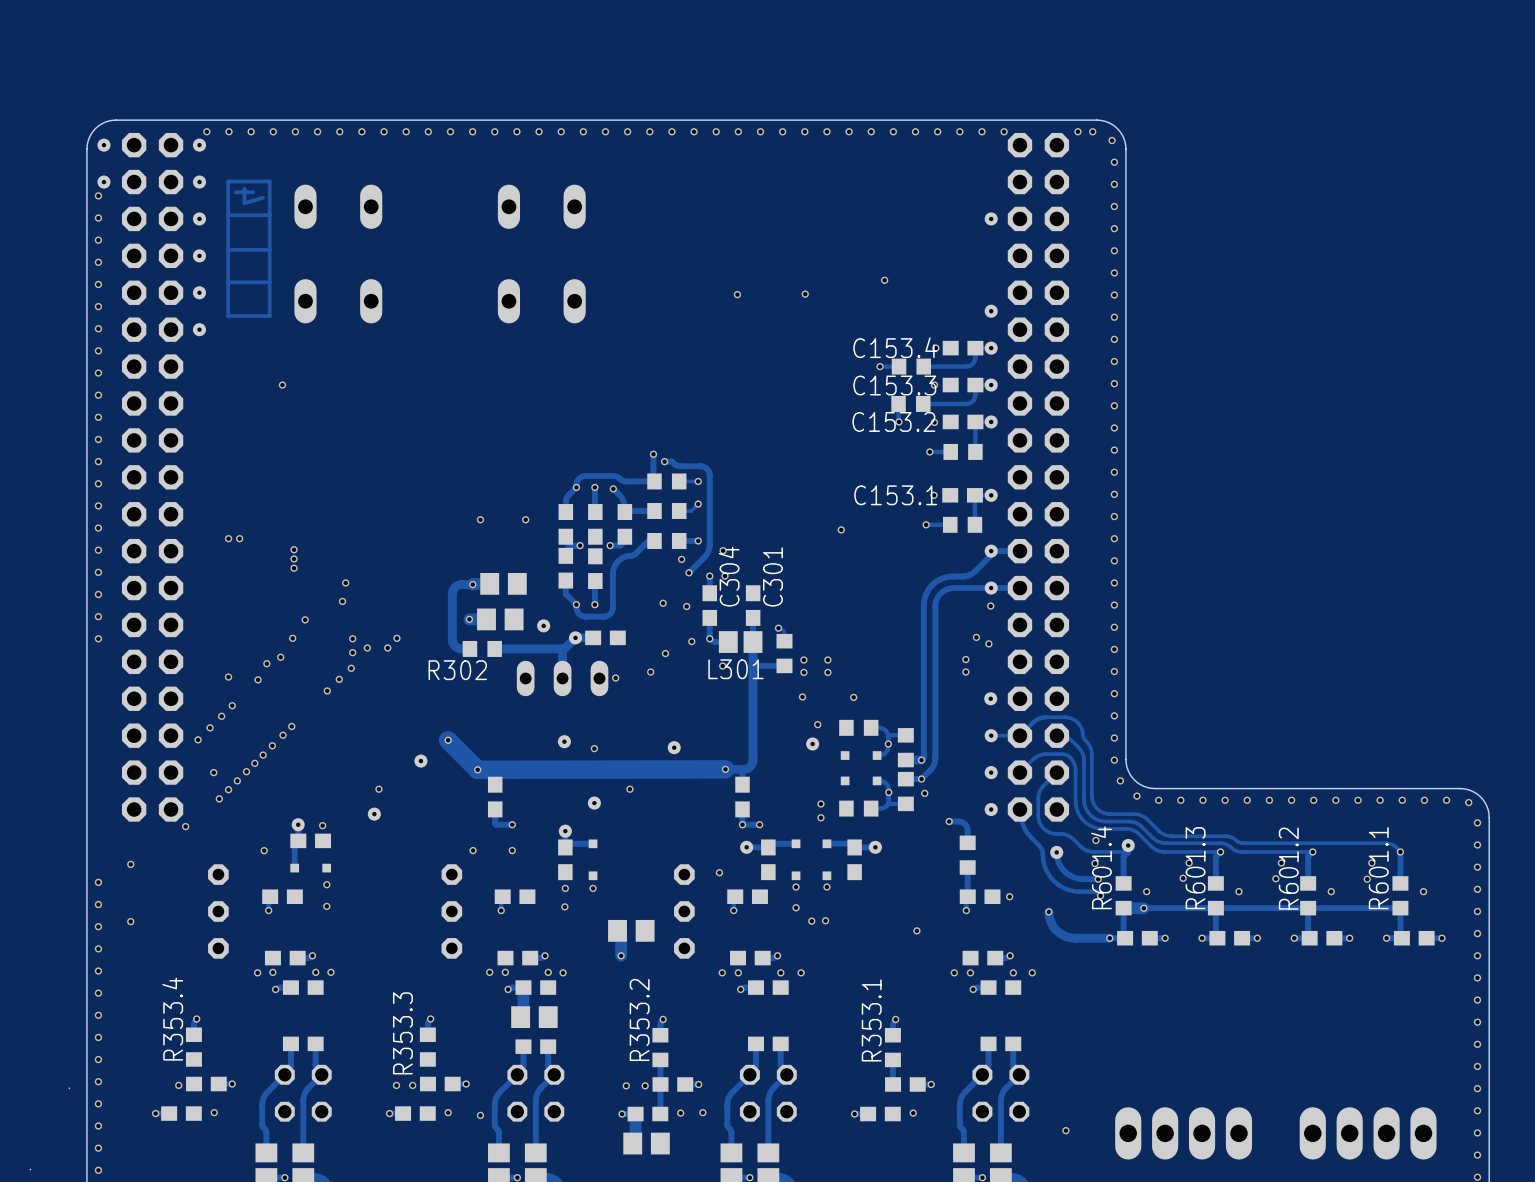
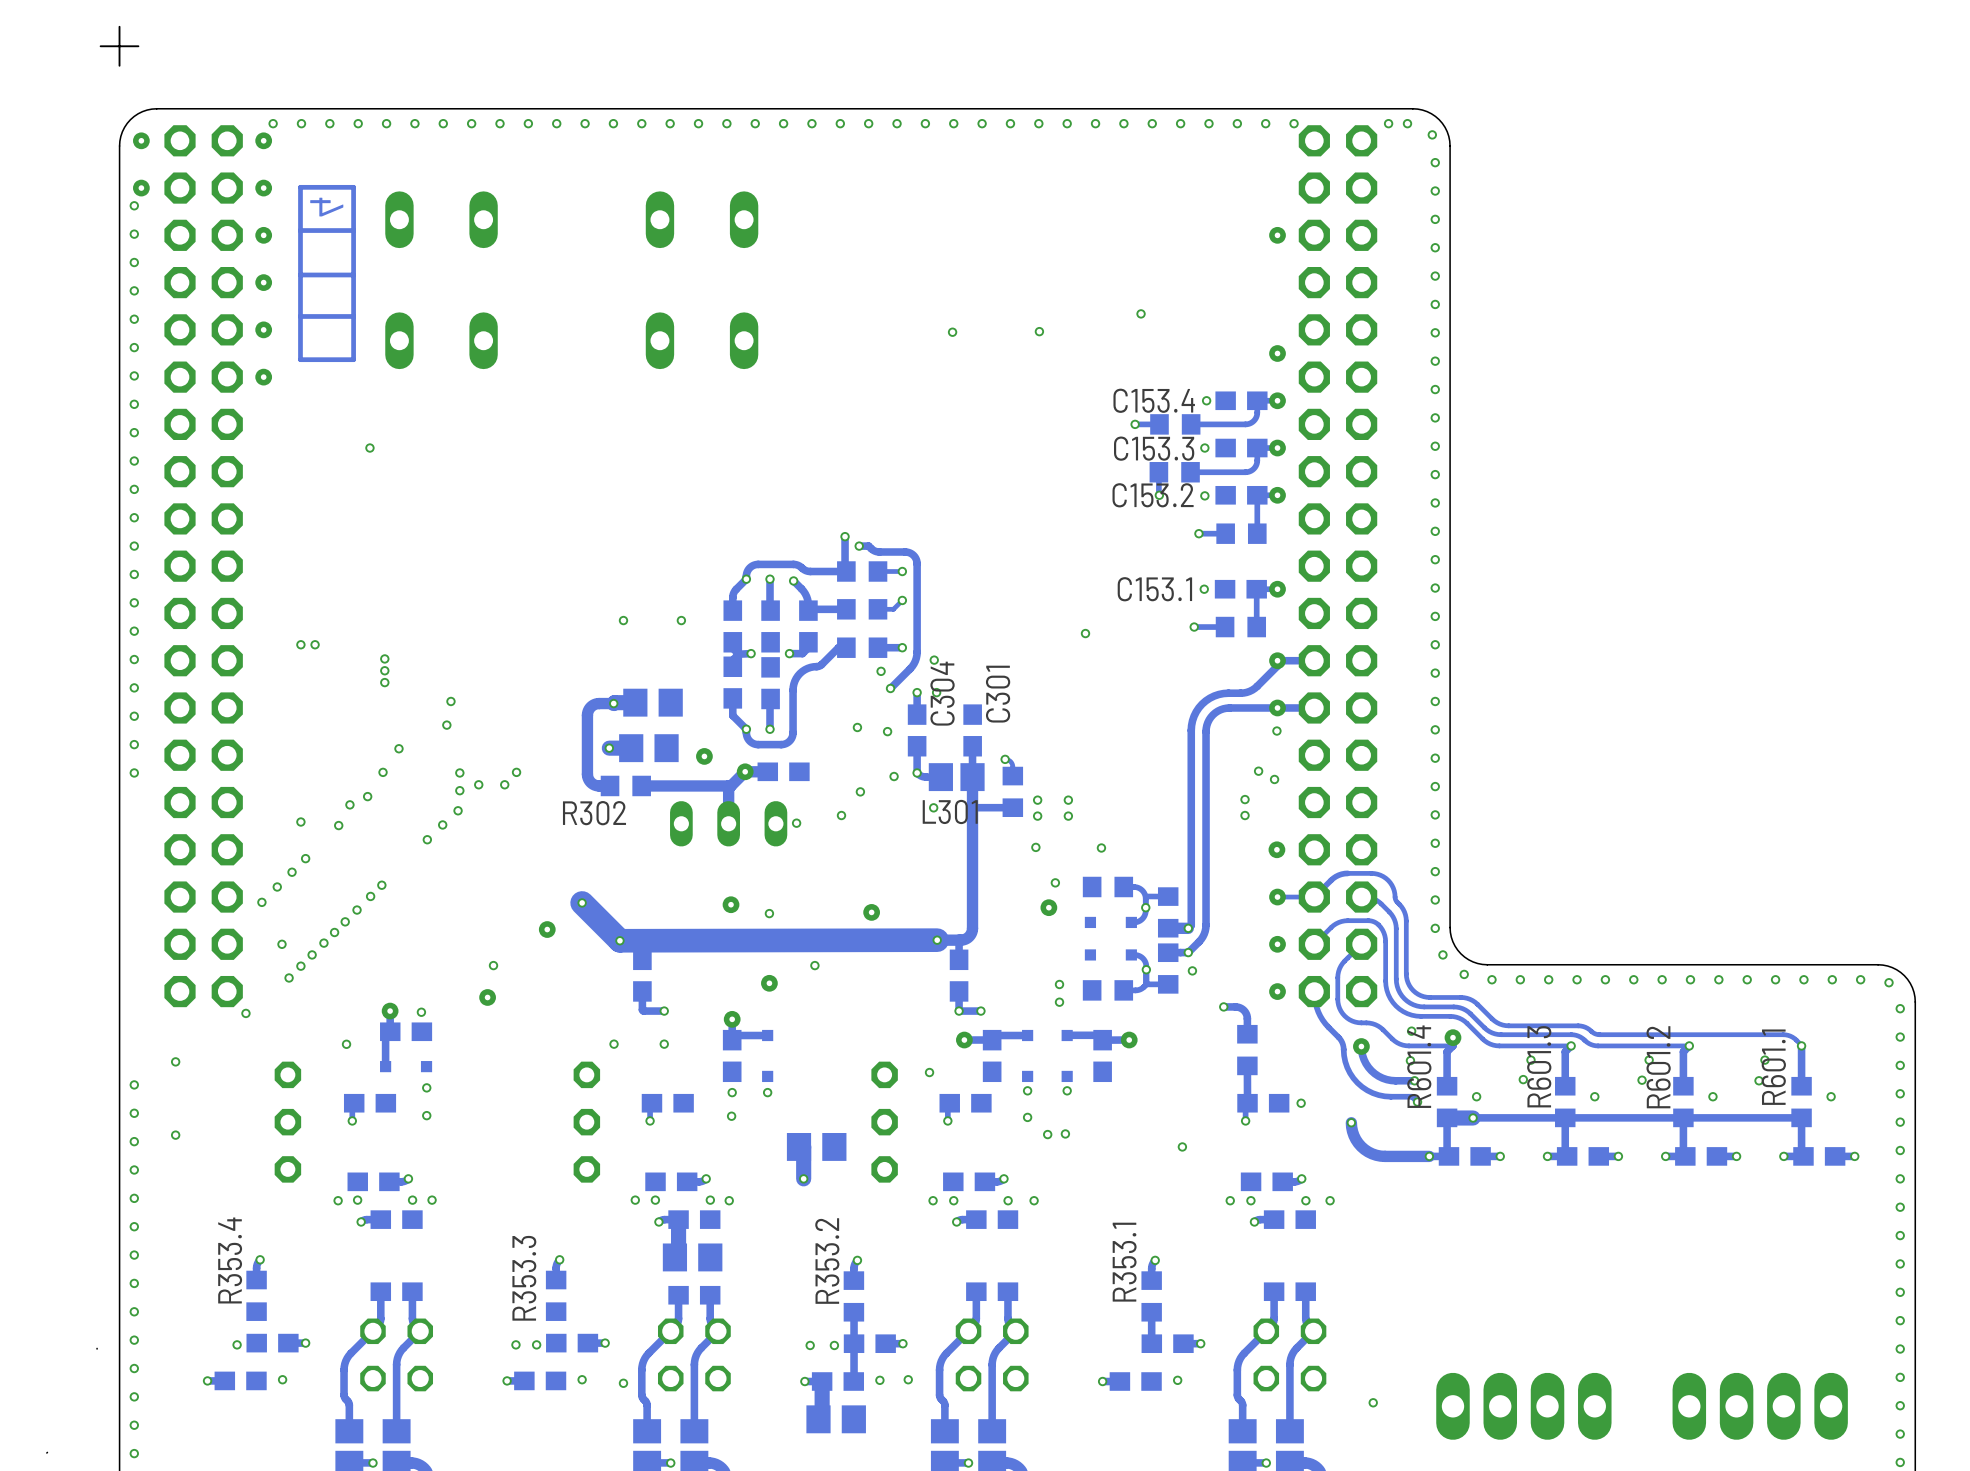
board edge: none -> (119, 26) (119, 65)
board edge: none -> (138, 46) (100, 46)

